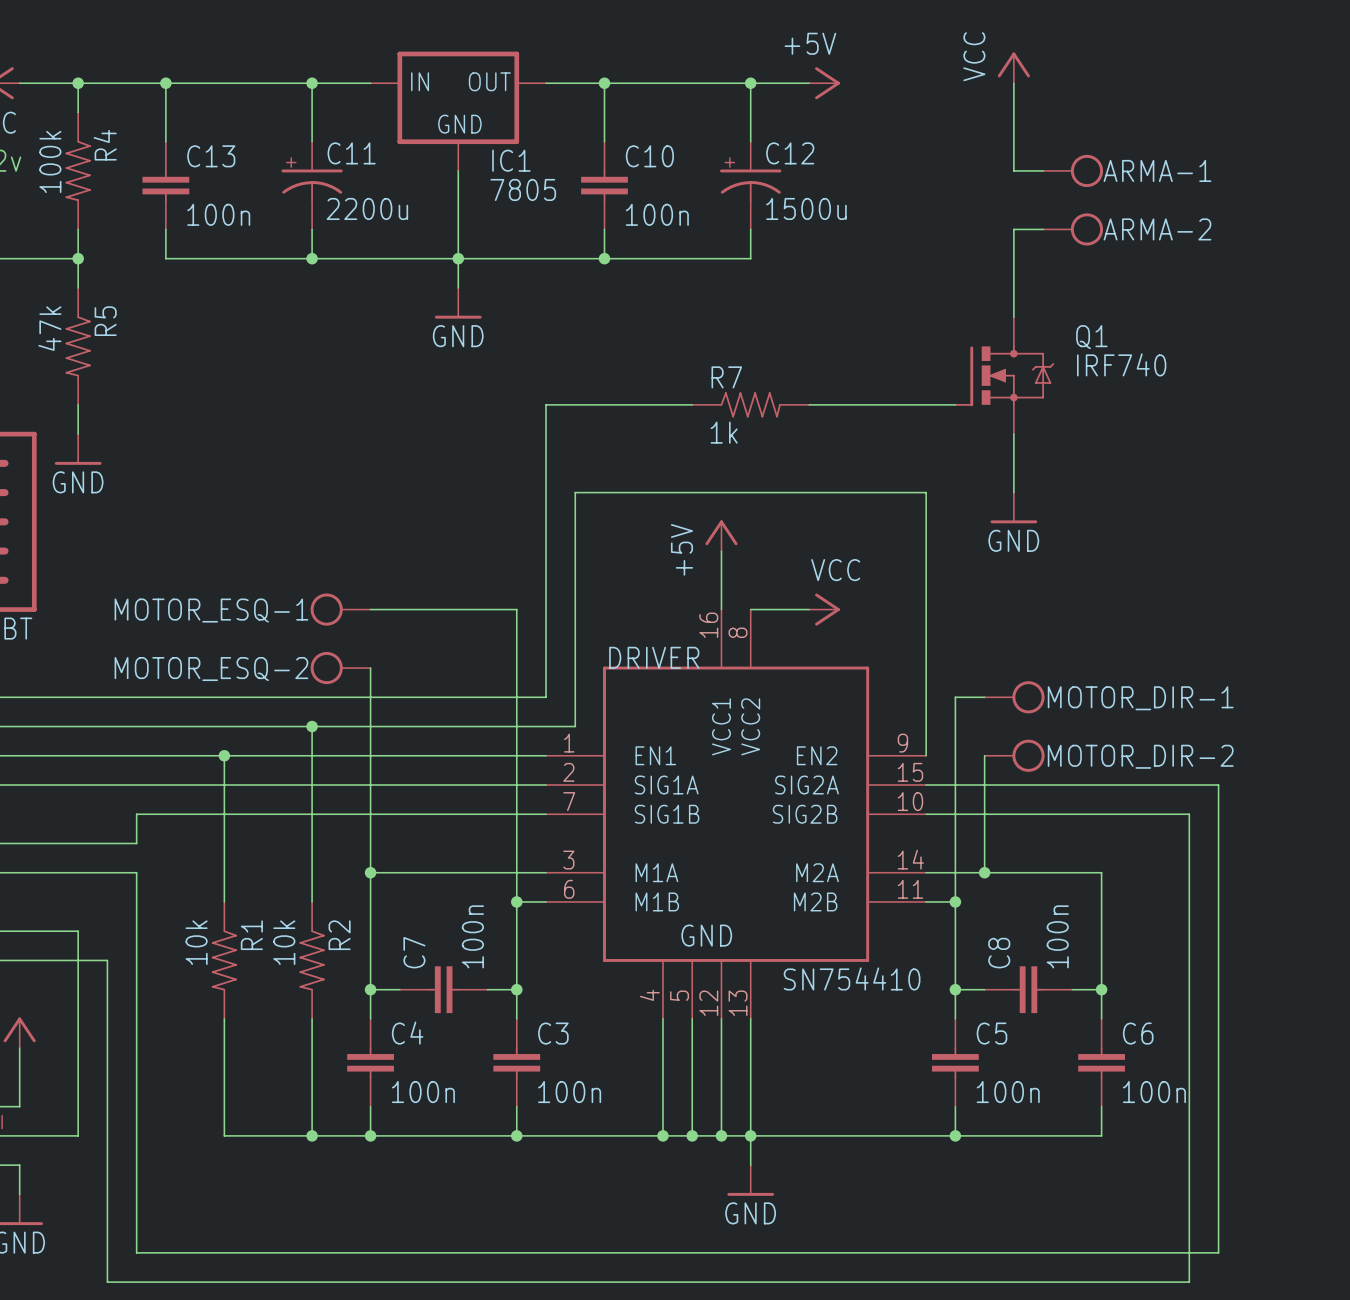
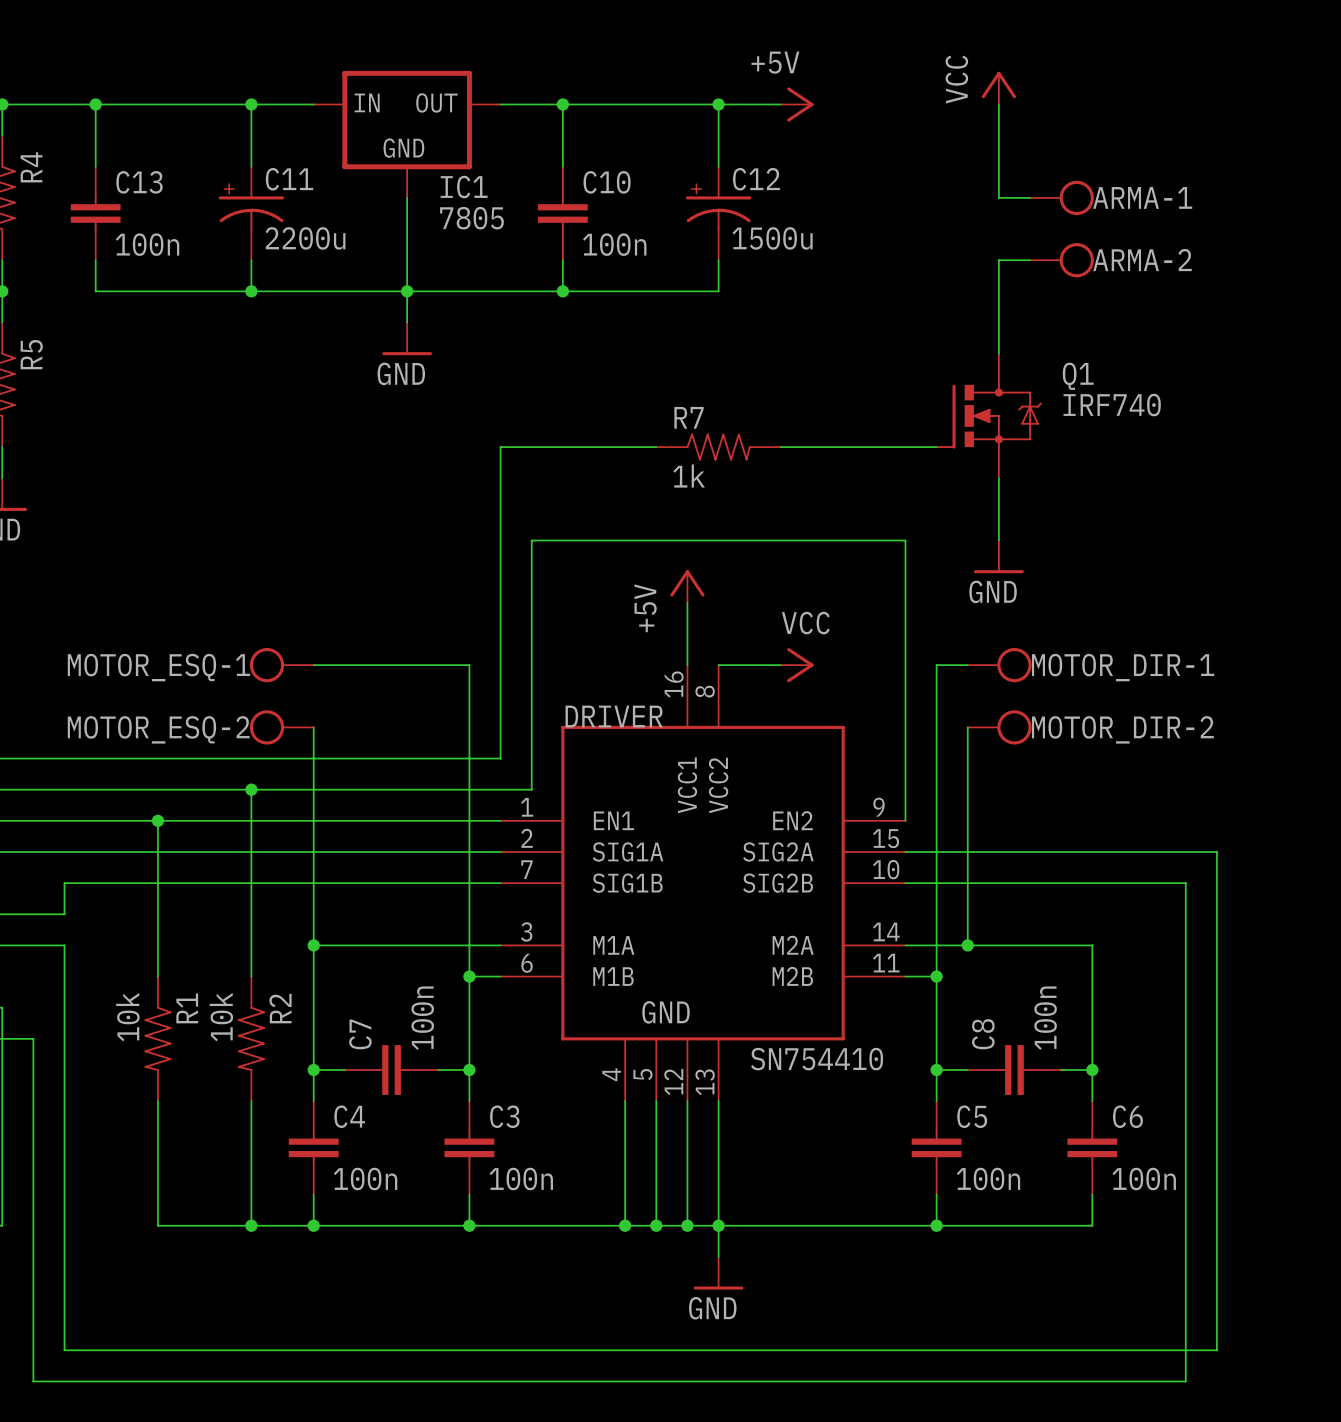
wire: none -> (967, 727) (967, 820)
wire: (955, 697) (984, 697) -> (936, 758) (936, 665) (967, 665)
MOTOR_DIR-1 position: (1014, 697) -> (999, 665)
MOTOR_DIR-2 position: (1014, 755) -> (999, 727)

